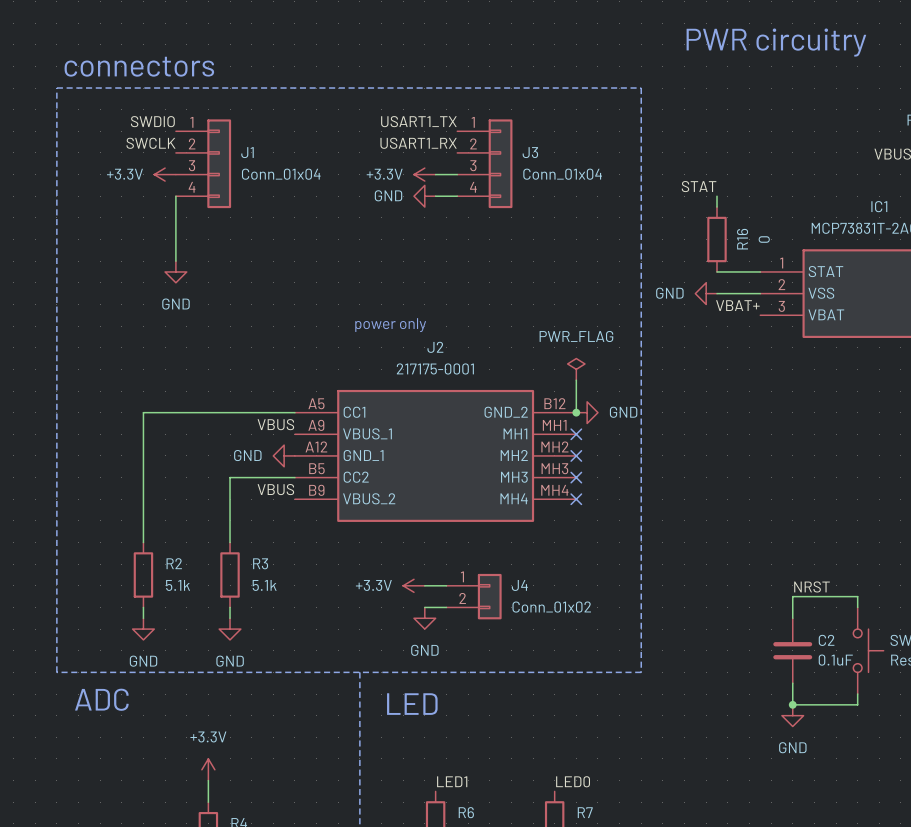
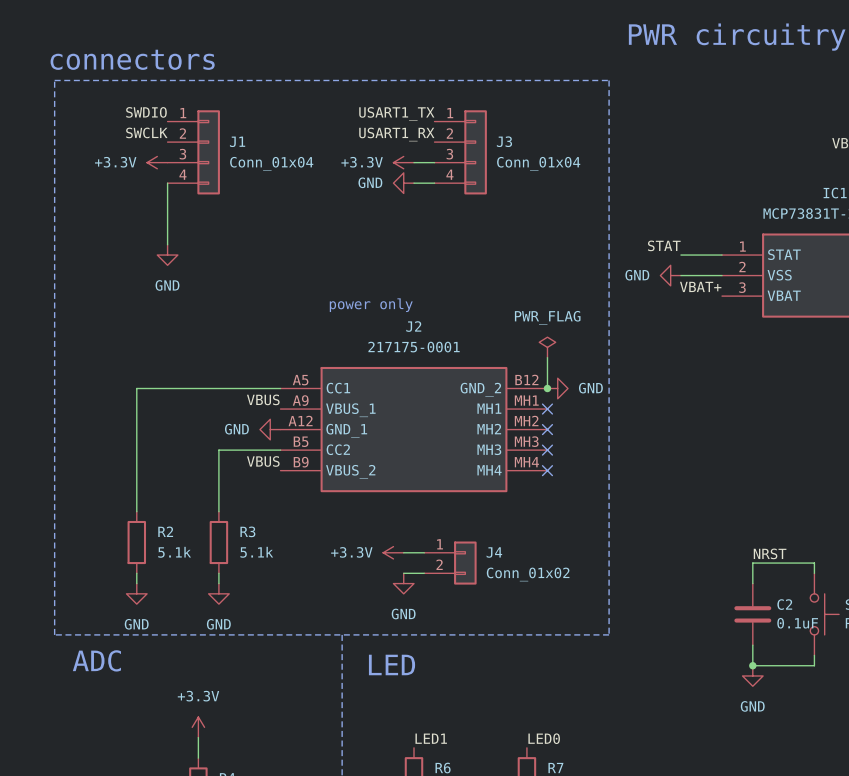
label position: STAT (699, 186) -> STAT (664, 245)
wire: (717, 196) (717, 207) -> none
R16: 0 (717, 239) -> none

